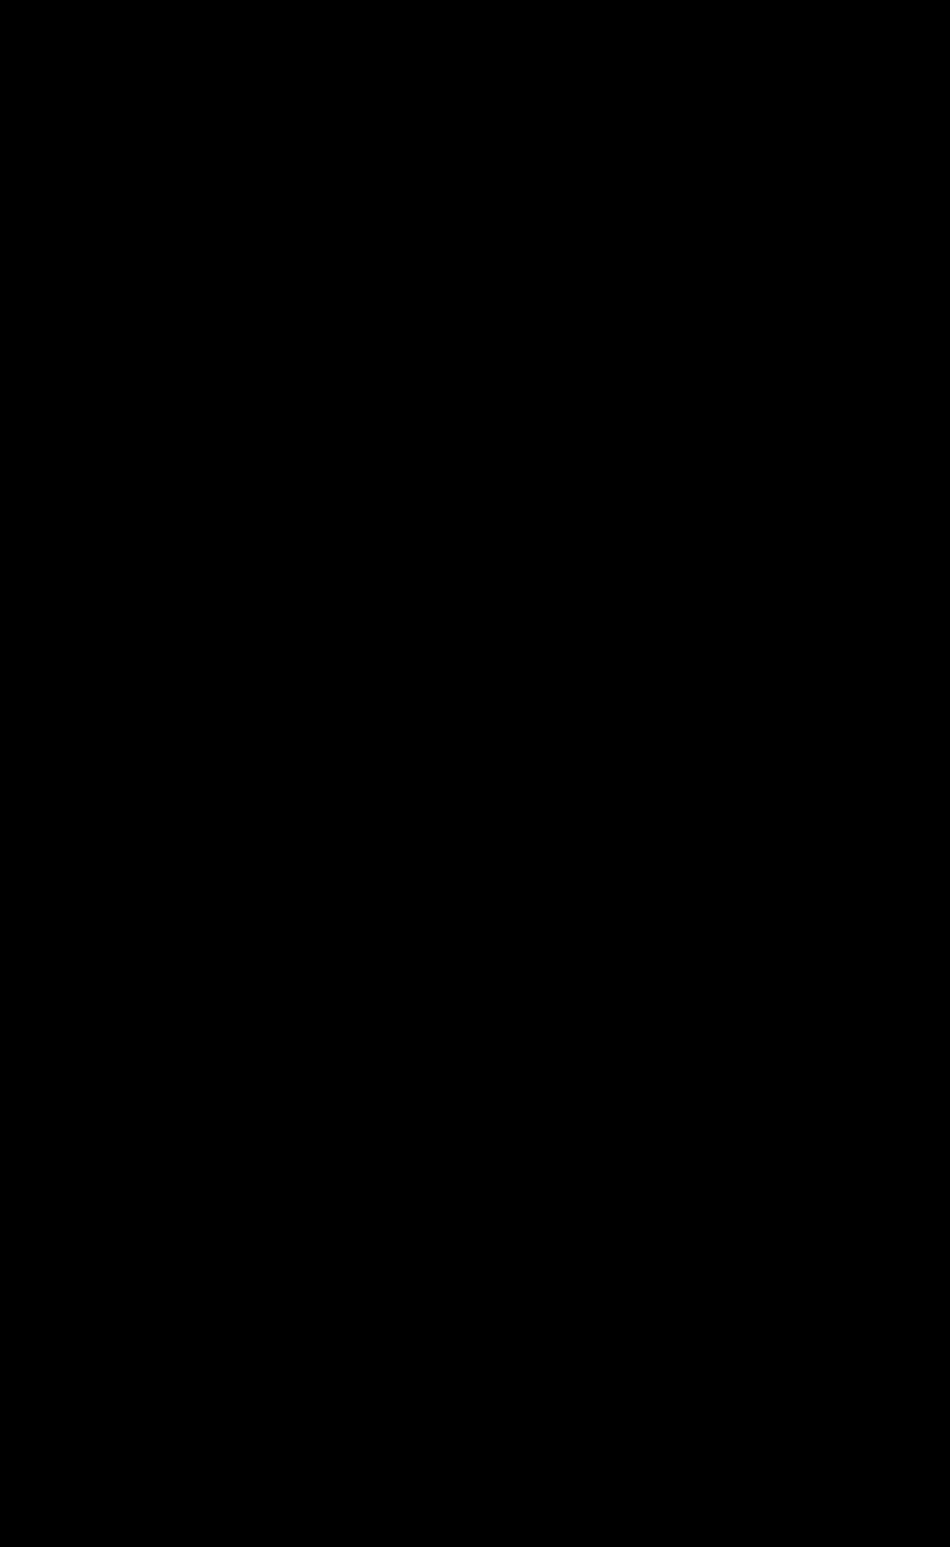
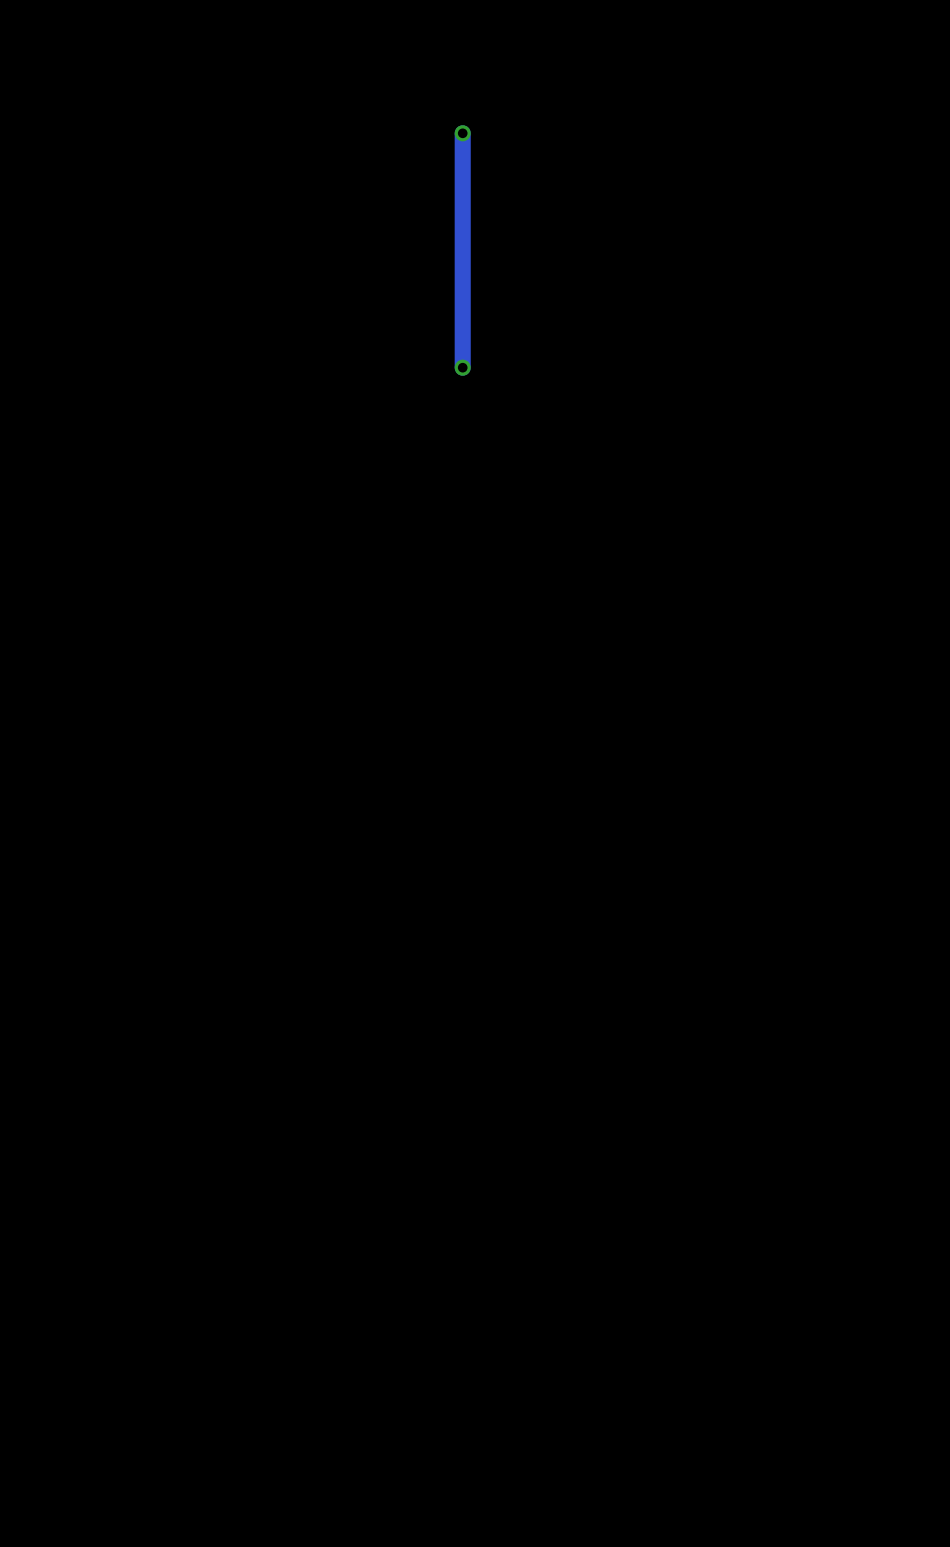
track: none -> (462, 133) (462, 367)
via: none -> (462, 133)
via: none -> (462, 367)

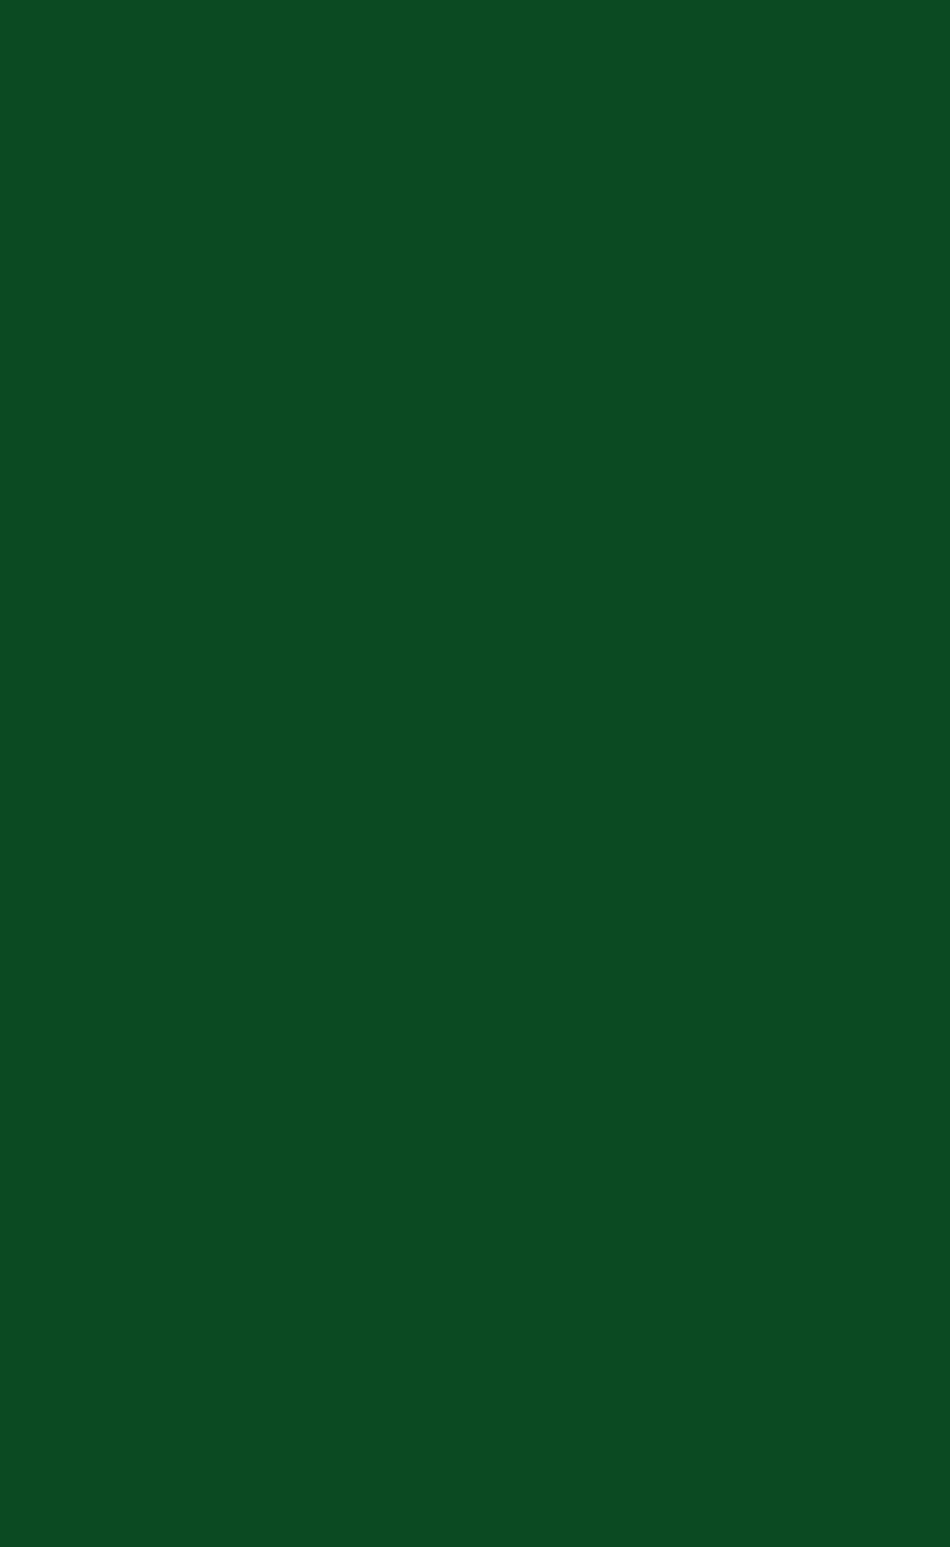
track: (462, 133) (462, 367) -> none
via: (462, 133) -> none
via: (462, 367) -> none

